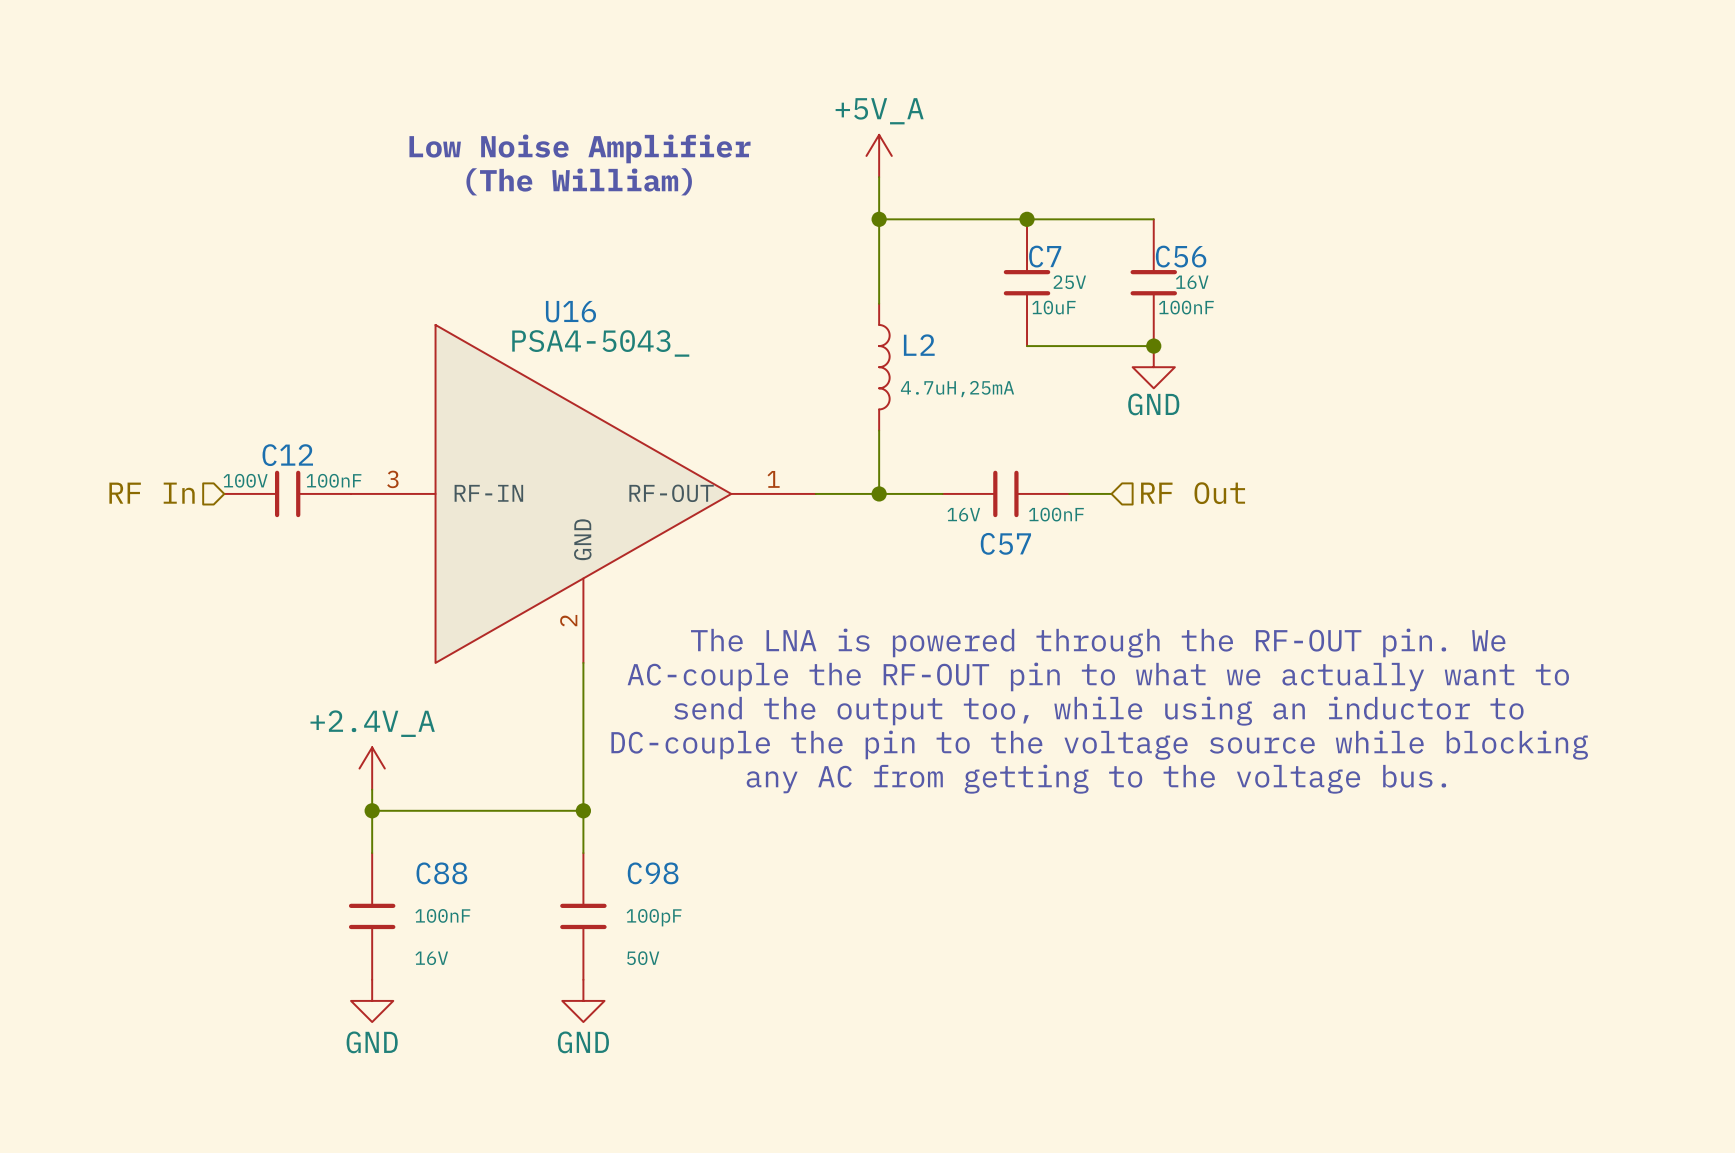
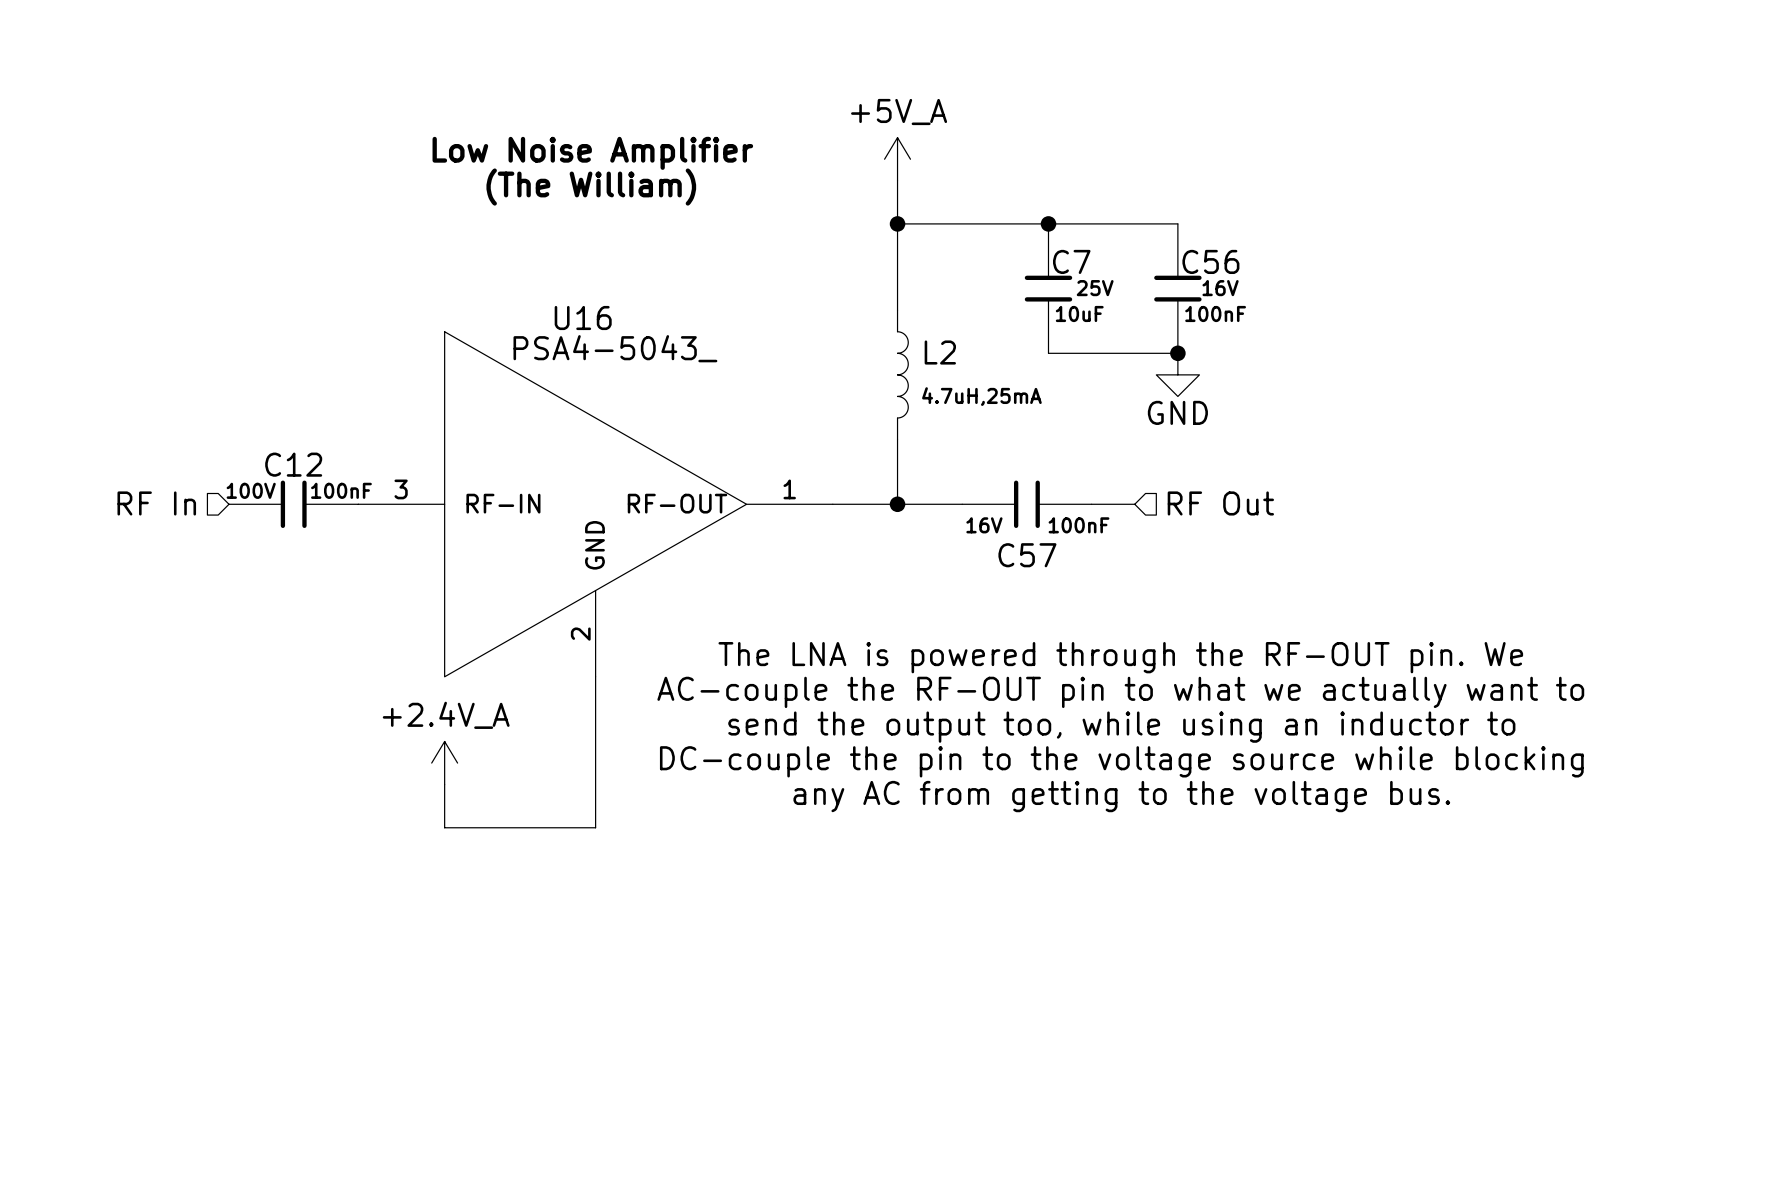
power symbol position: +2.4V_A (372, 768) -> +2.4V_A (444, 763)
wire: (372, 789) (372, 853) -> none
wire: (372, 810) (435, 810) -> (444, 784) (444, 827)
junction: (372, 810) -> none
wire: (583, 810) (583, 853) -> none
junction: (583, 810) -> none
C88: 100nF (372, 916) -> none
C98: 100pF (583, 916) -> none
power symbol: GND (372, 1000) -> none
power symbol: GND (583, 1000) -> none

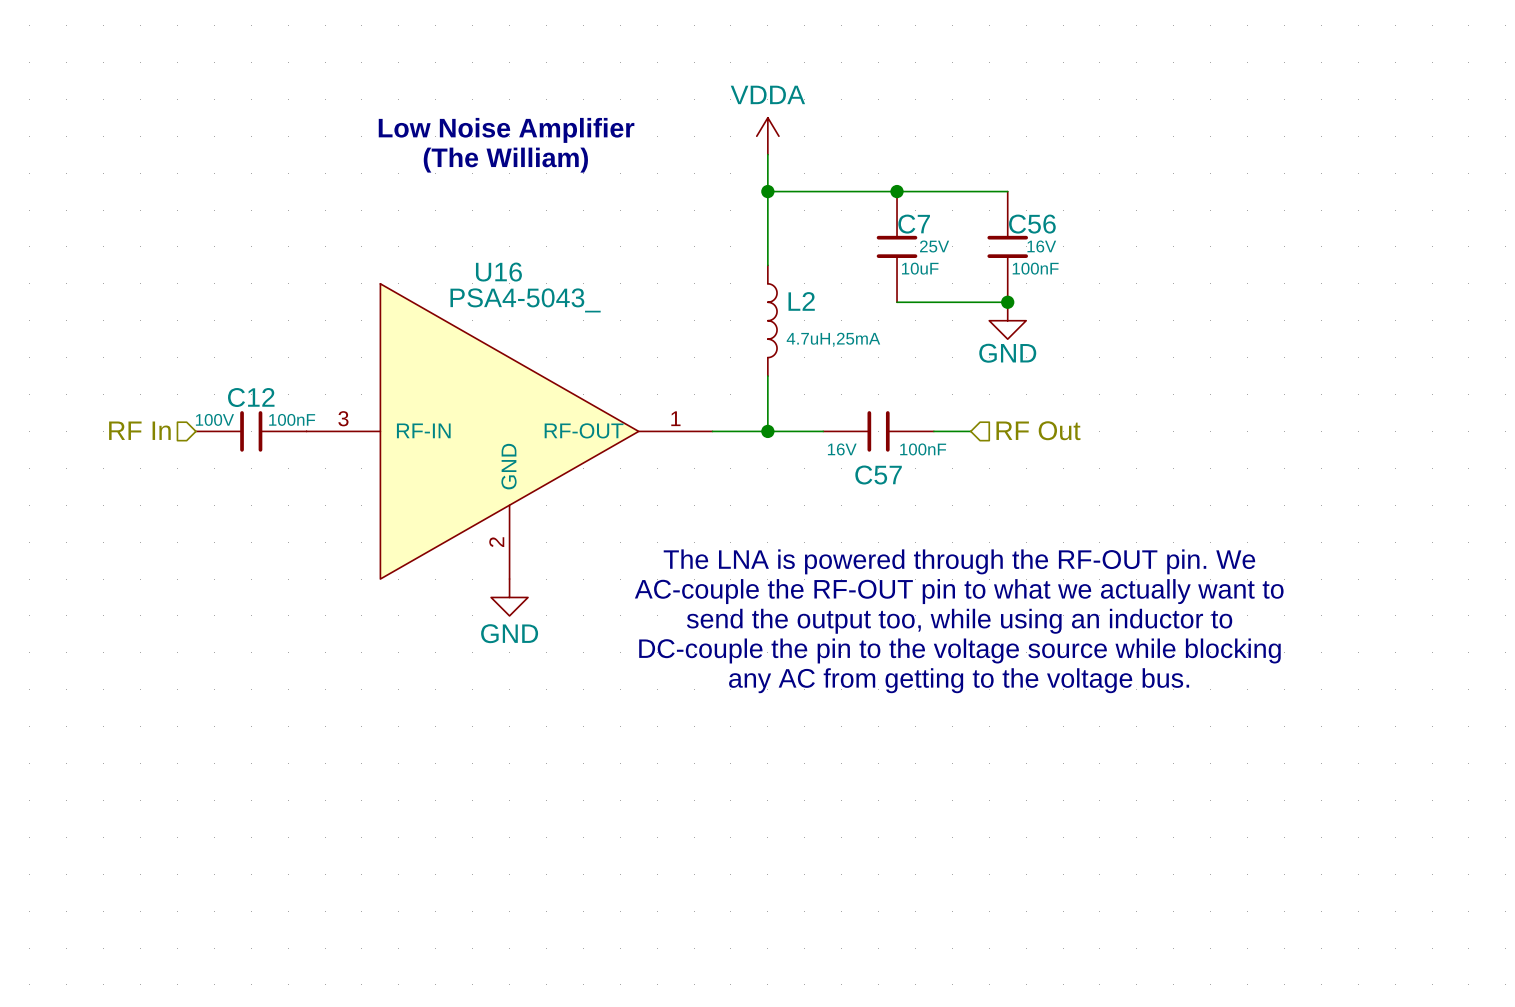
power symbol: +5V_A (897, 159) -> VDDA (767, 136)
wire: (595, 676) (595, 827) (444, 827) (444, 784) -> none
power symbol: none -> GND (509, 597)
power symbol: +2.4V_A (444, 763) -> none

